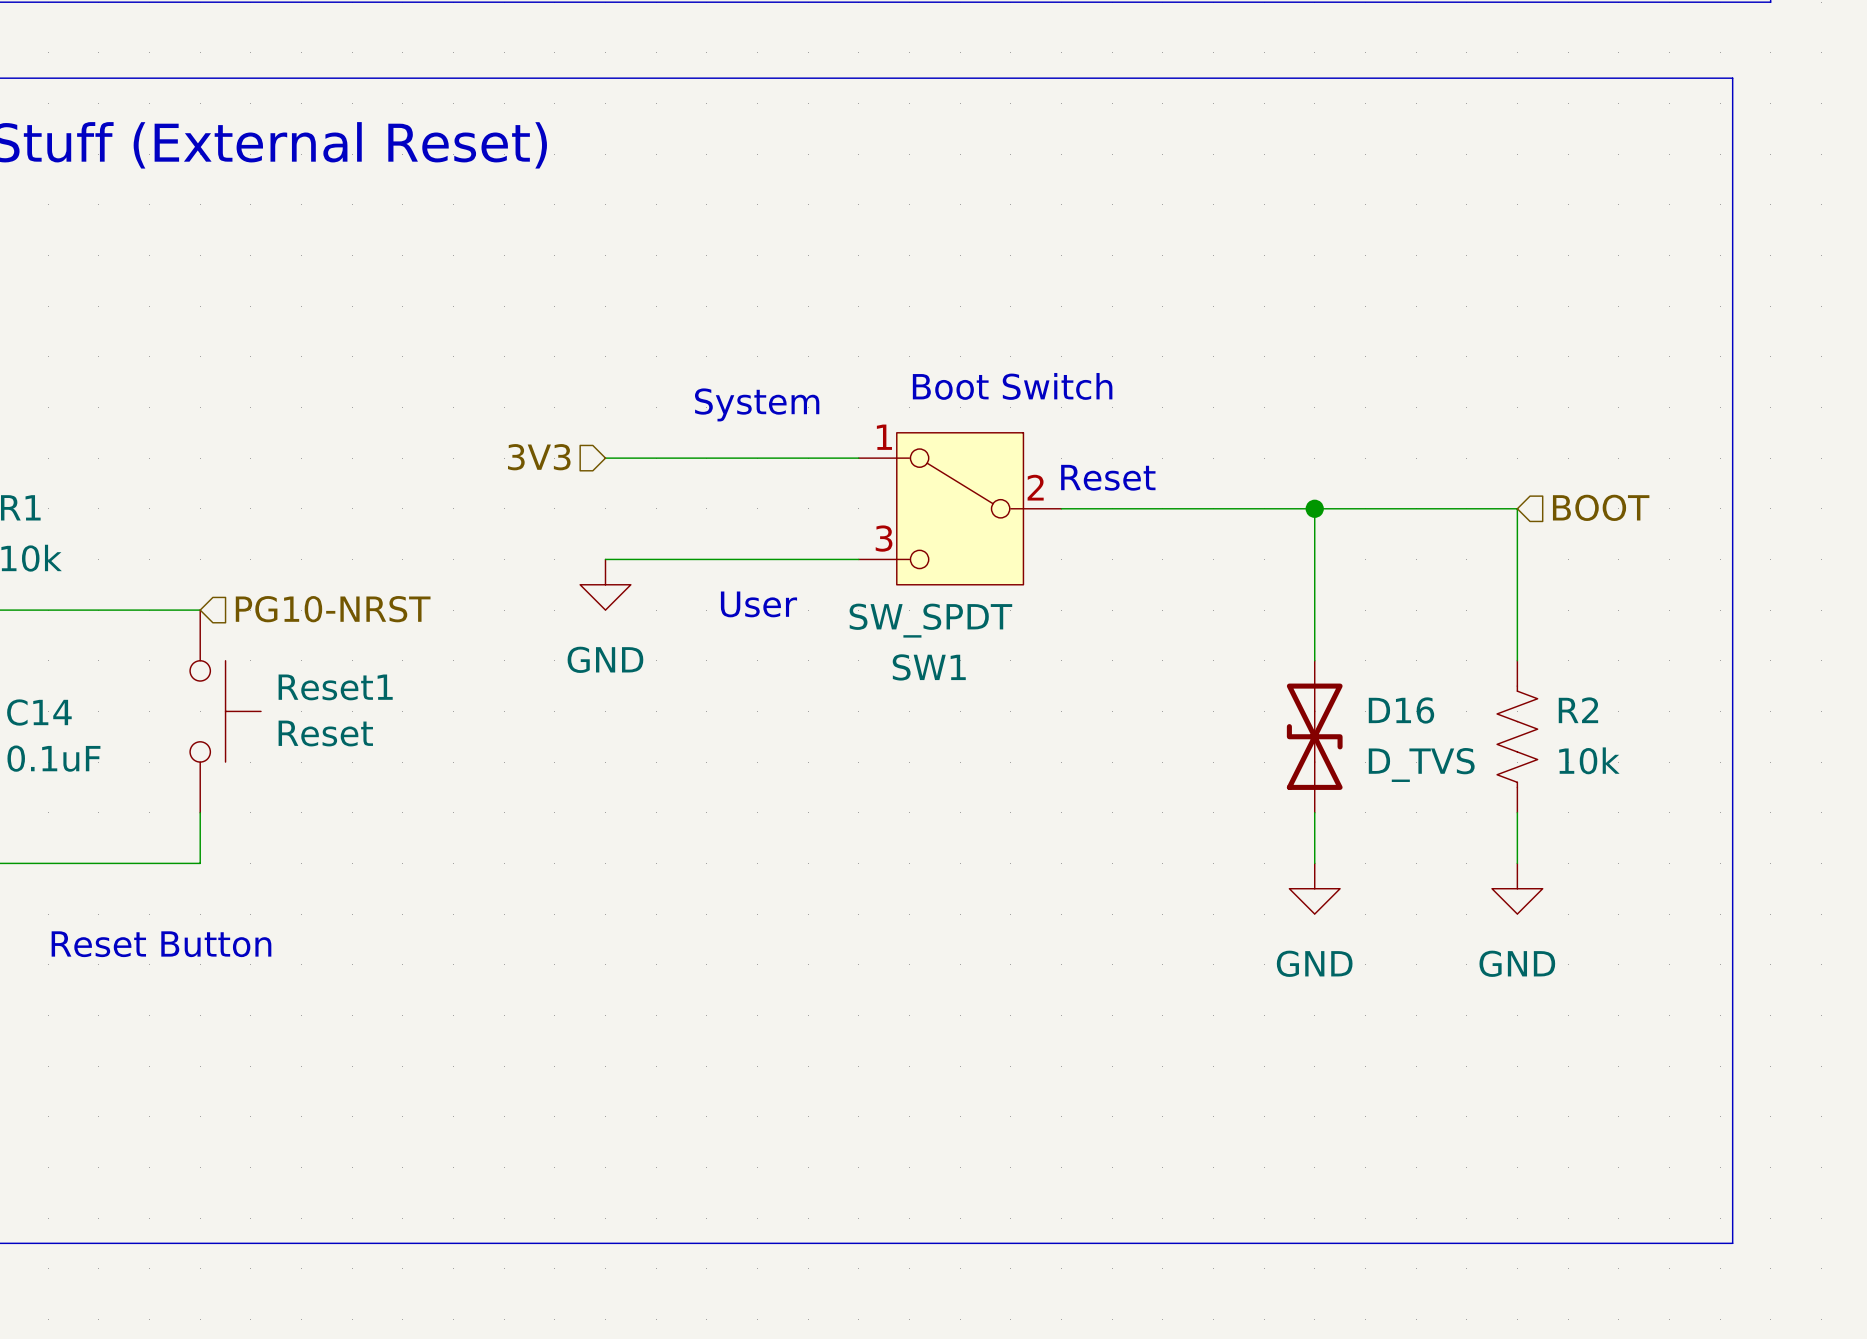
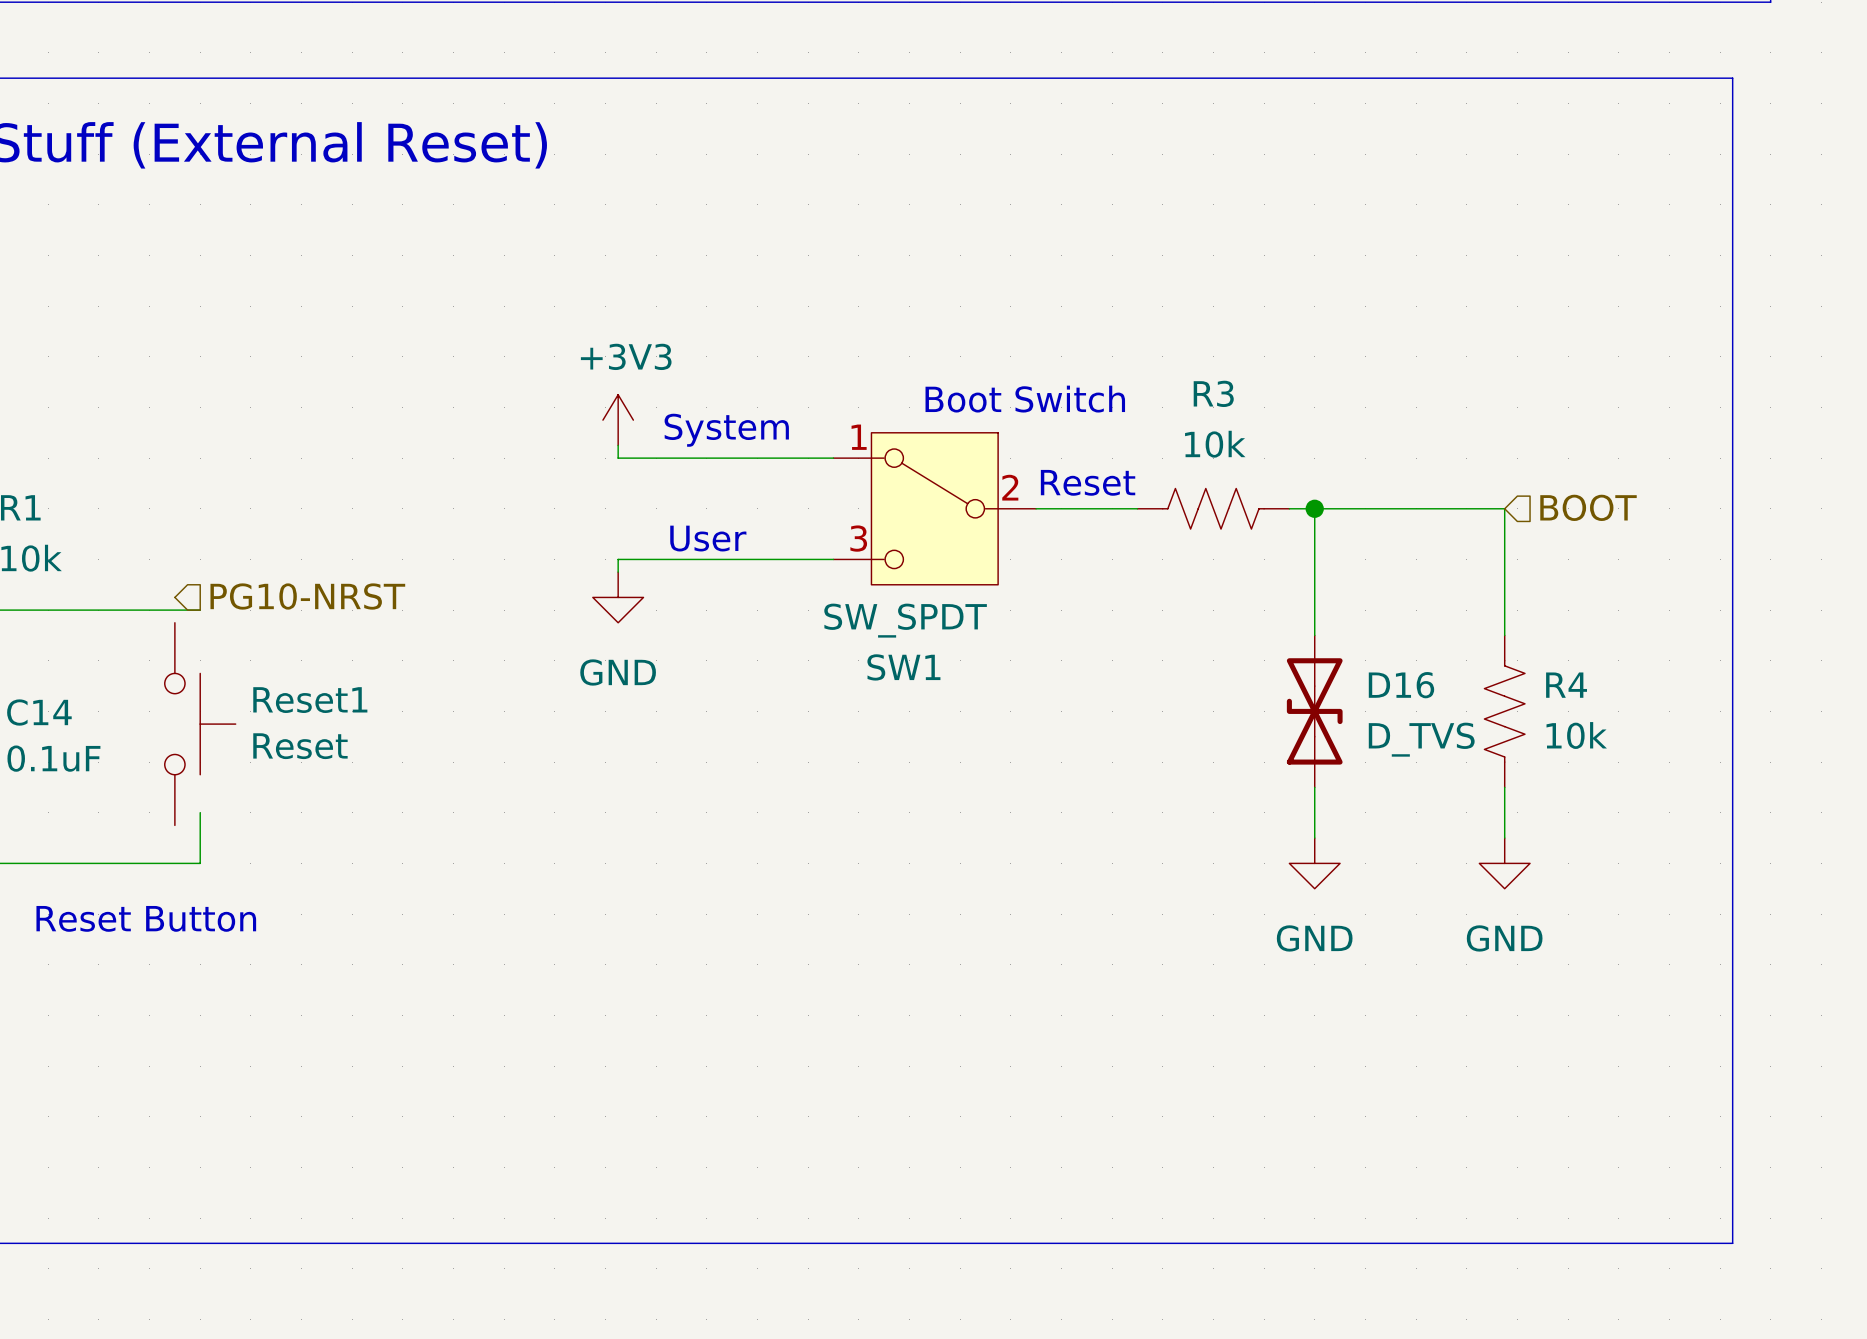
text position: Boot Switch (1012, 386) -> Boot Switch (1025, 399)
text position: System (757, 404) -> System (726, 430)
power symbol: none -> +3V3 (618, 420)
hierarchical label: 3V3 (539, 457) -> none
wire: (605, 458) (618, 458) -> (618, 445) (618, 458)
text position: Reset (1108, 477) -> Reset (1088, 482)
hierarchical label position: BOOT (1601, 507) -> BOOT (1588, 507)
SW1 position: (960, 508) -> (934, 508)
wire: (1137, 508) (1289, 508) -> none
R3: none -> 10k (1213, 508)
wire: (1504, 508) (1517, 508) (1517, 660) -> (1504, 508) (1504, 635)
wire: (605, 559) (618, 559) -> (618, 572) (618, 559)
power symbol position: GND (605, 584) -> GND (618, 597)
text position: User (758, 604) -> User (708, 538)
hierarchical label position: PG10-NRST (333, 609) -> PG10-NRST (307, 596)
Reset1 position: (225, 711) -> (200, 724)
R4: none -> 10k (1504, 711)
D16 position: (1314, 736) -> (1314, 711)
R2: 10k (1517, 736) -> none
wire: (1517, 812) (1517, 863) -> (1504, 787) (1504, 838)
power symbol position: GND (1314, 888) -> GND (1314, 863)
power symbol position: GND (1517, 888) -> GND (1504, 863)
text position: Reset Button (161, 944) -> Reset Button (146, 918)

